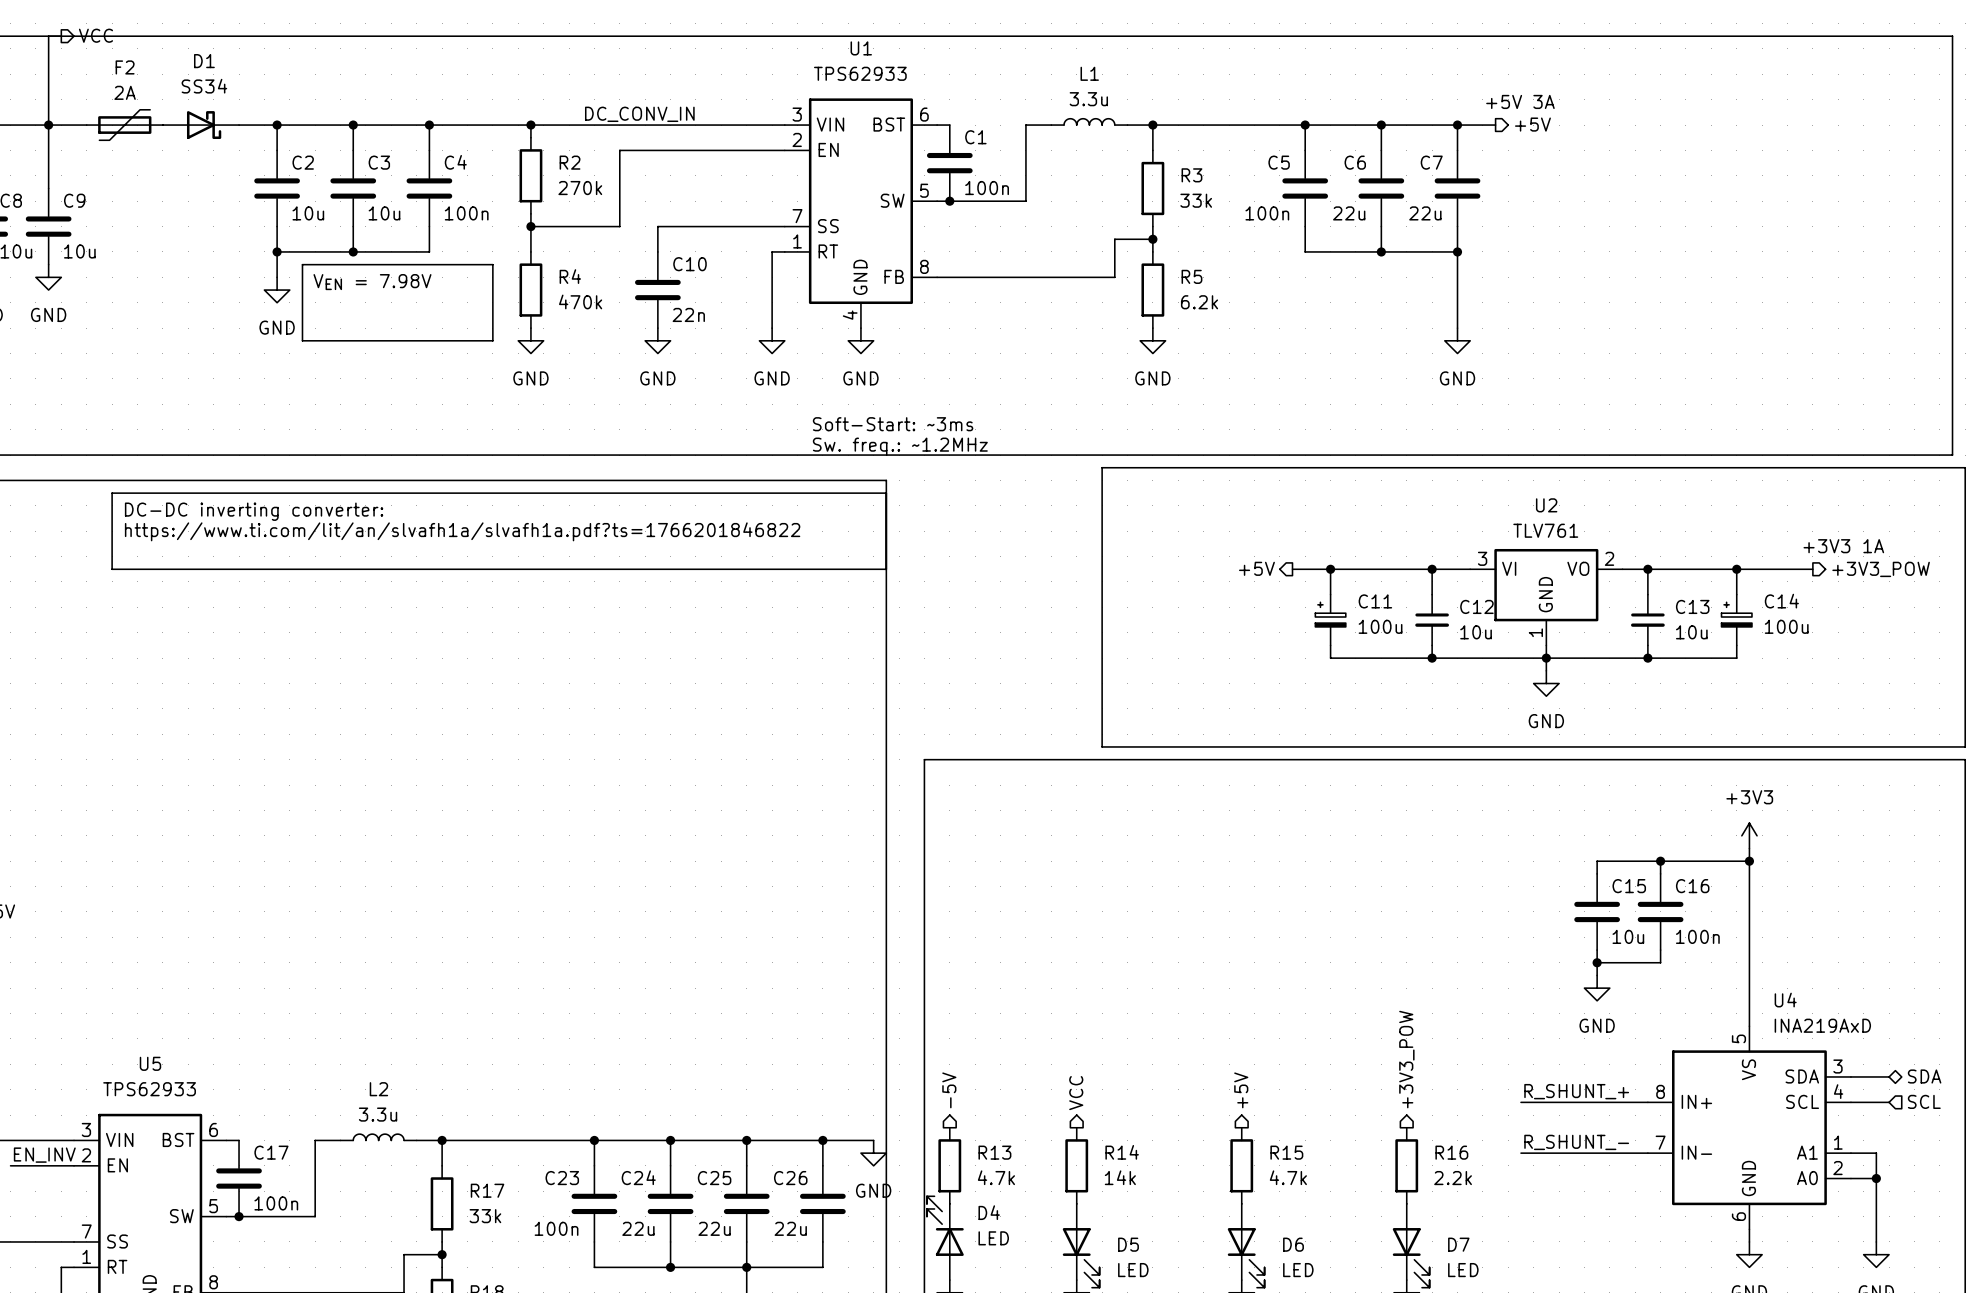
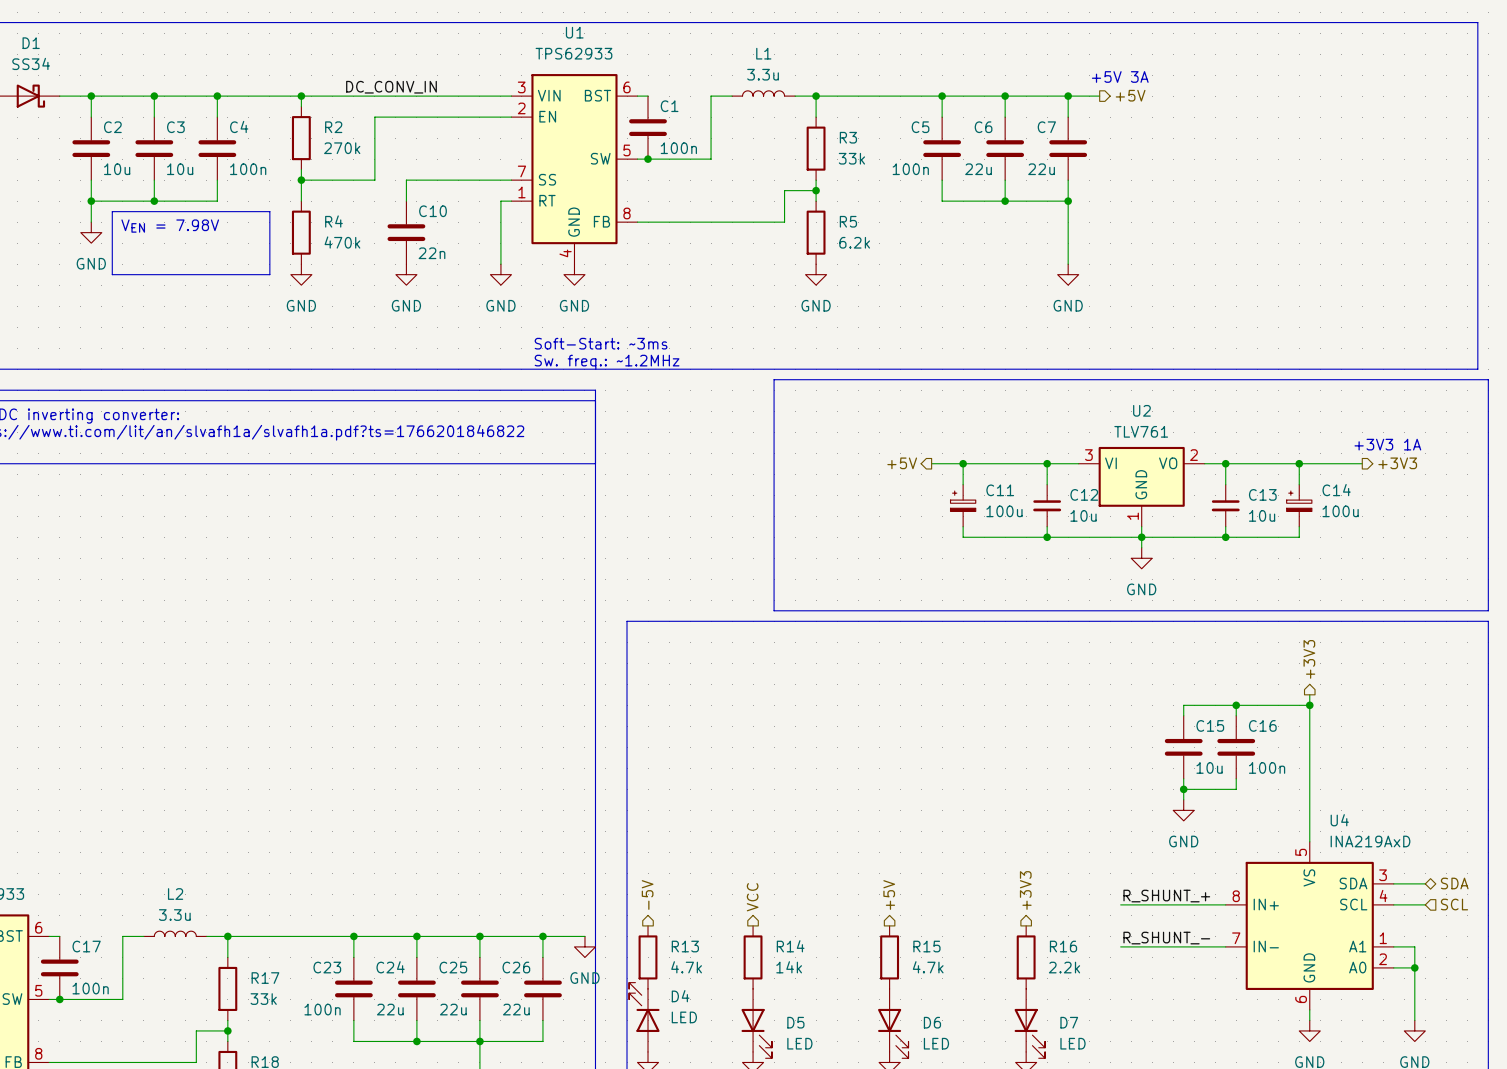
hierarchical label: +3V3_POW (1881, 569) -> +3V3 (1397, 463)
hierarchical label: none -> +3V3 (1309, 659)
power symbol: +3V3 (1749, 835) -> none
hierarchical label: +3V3_POW (1406, 1059) -> +3V3 (1025, 890)

